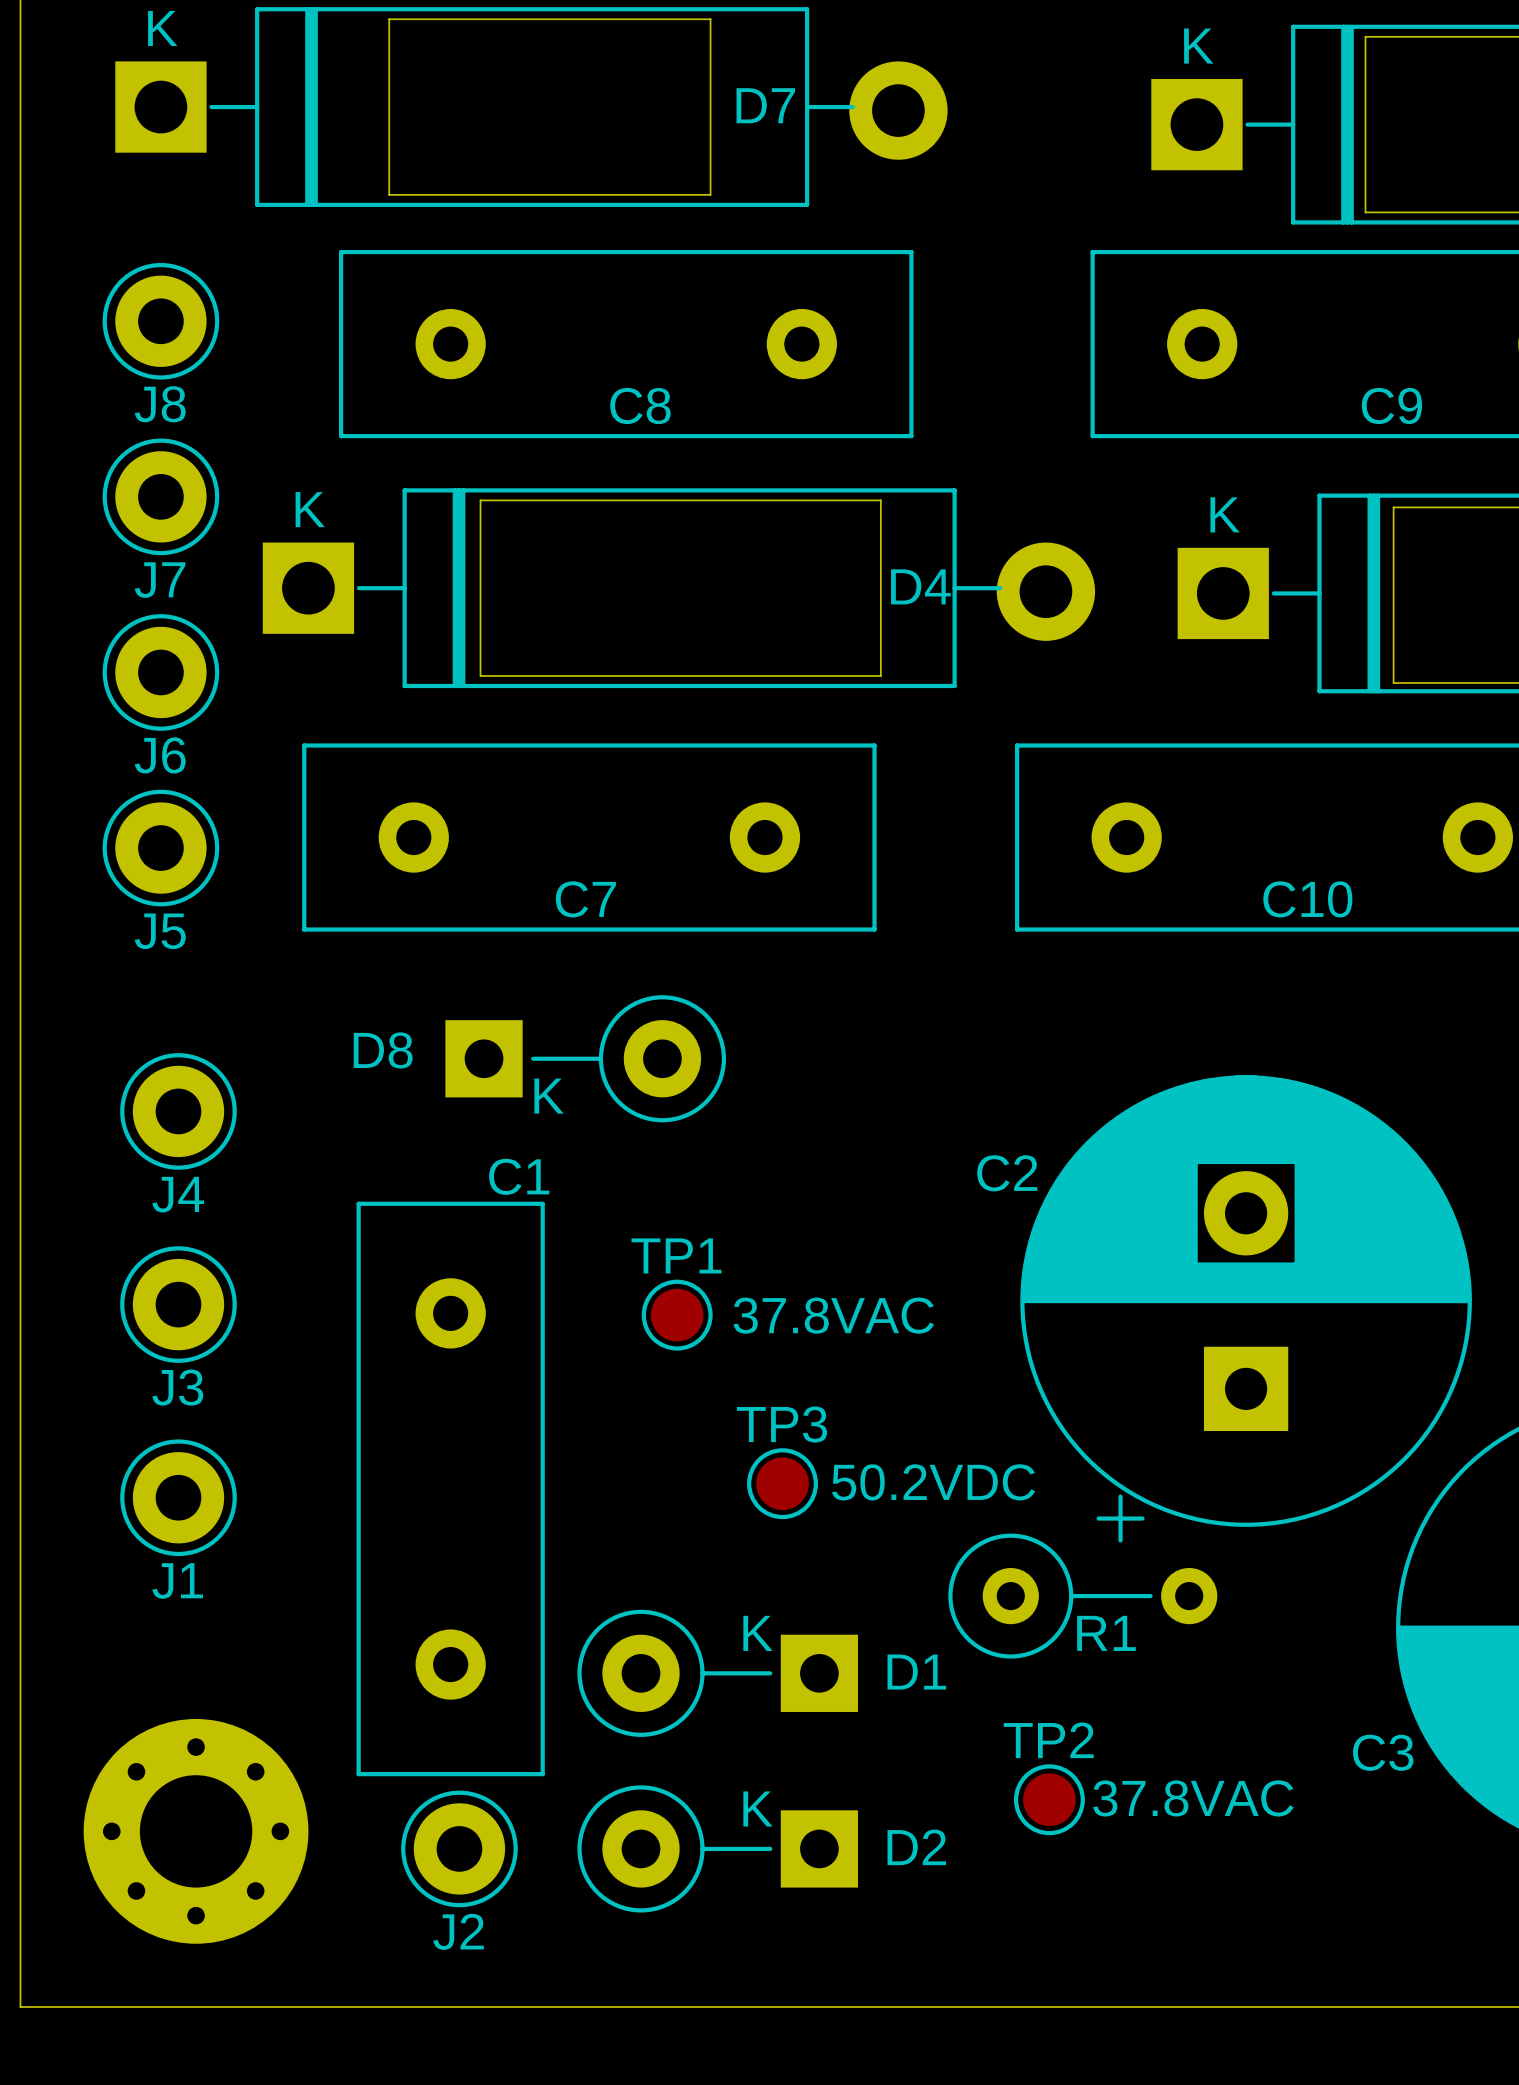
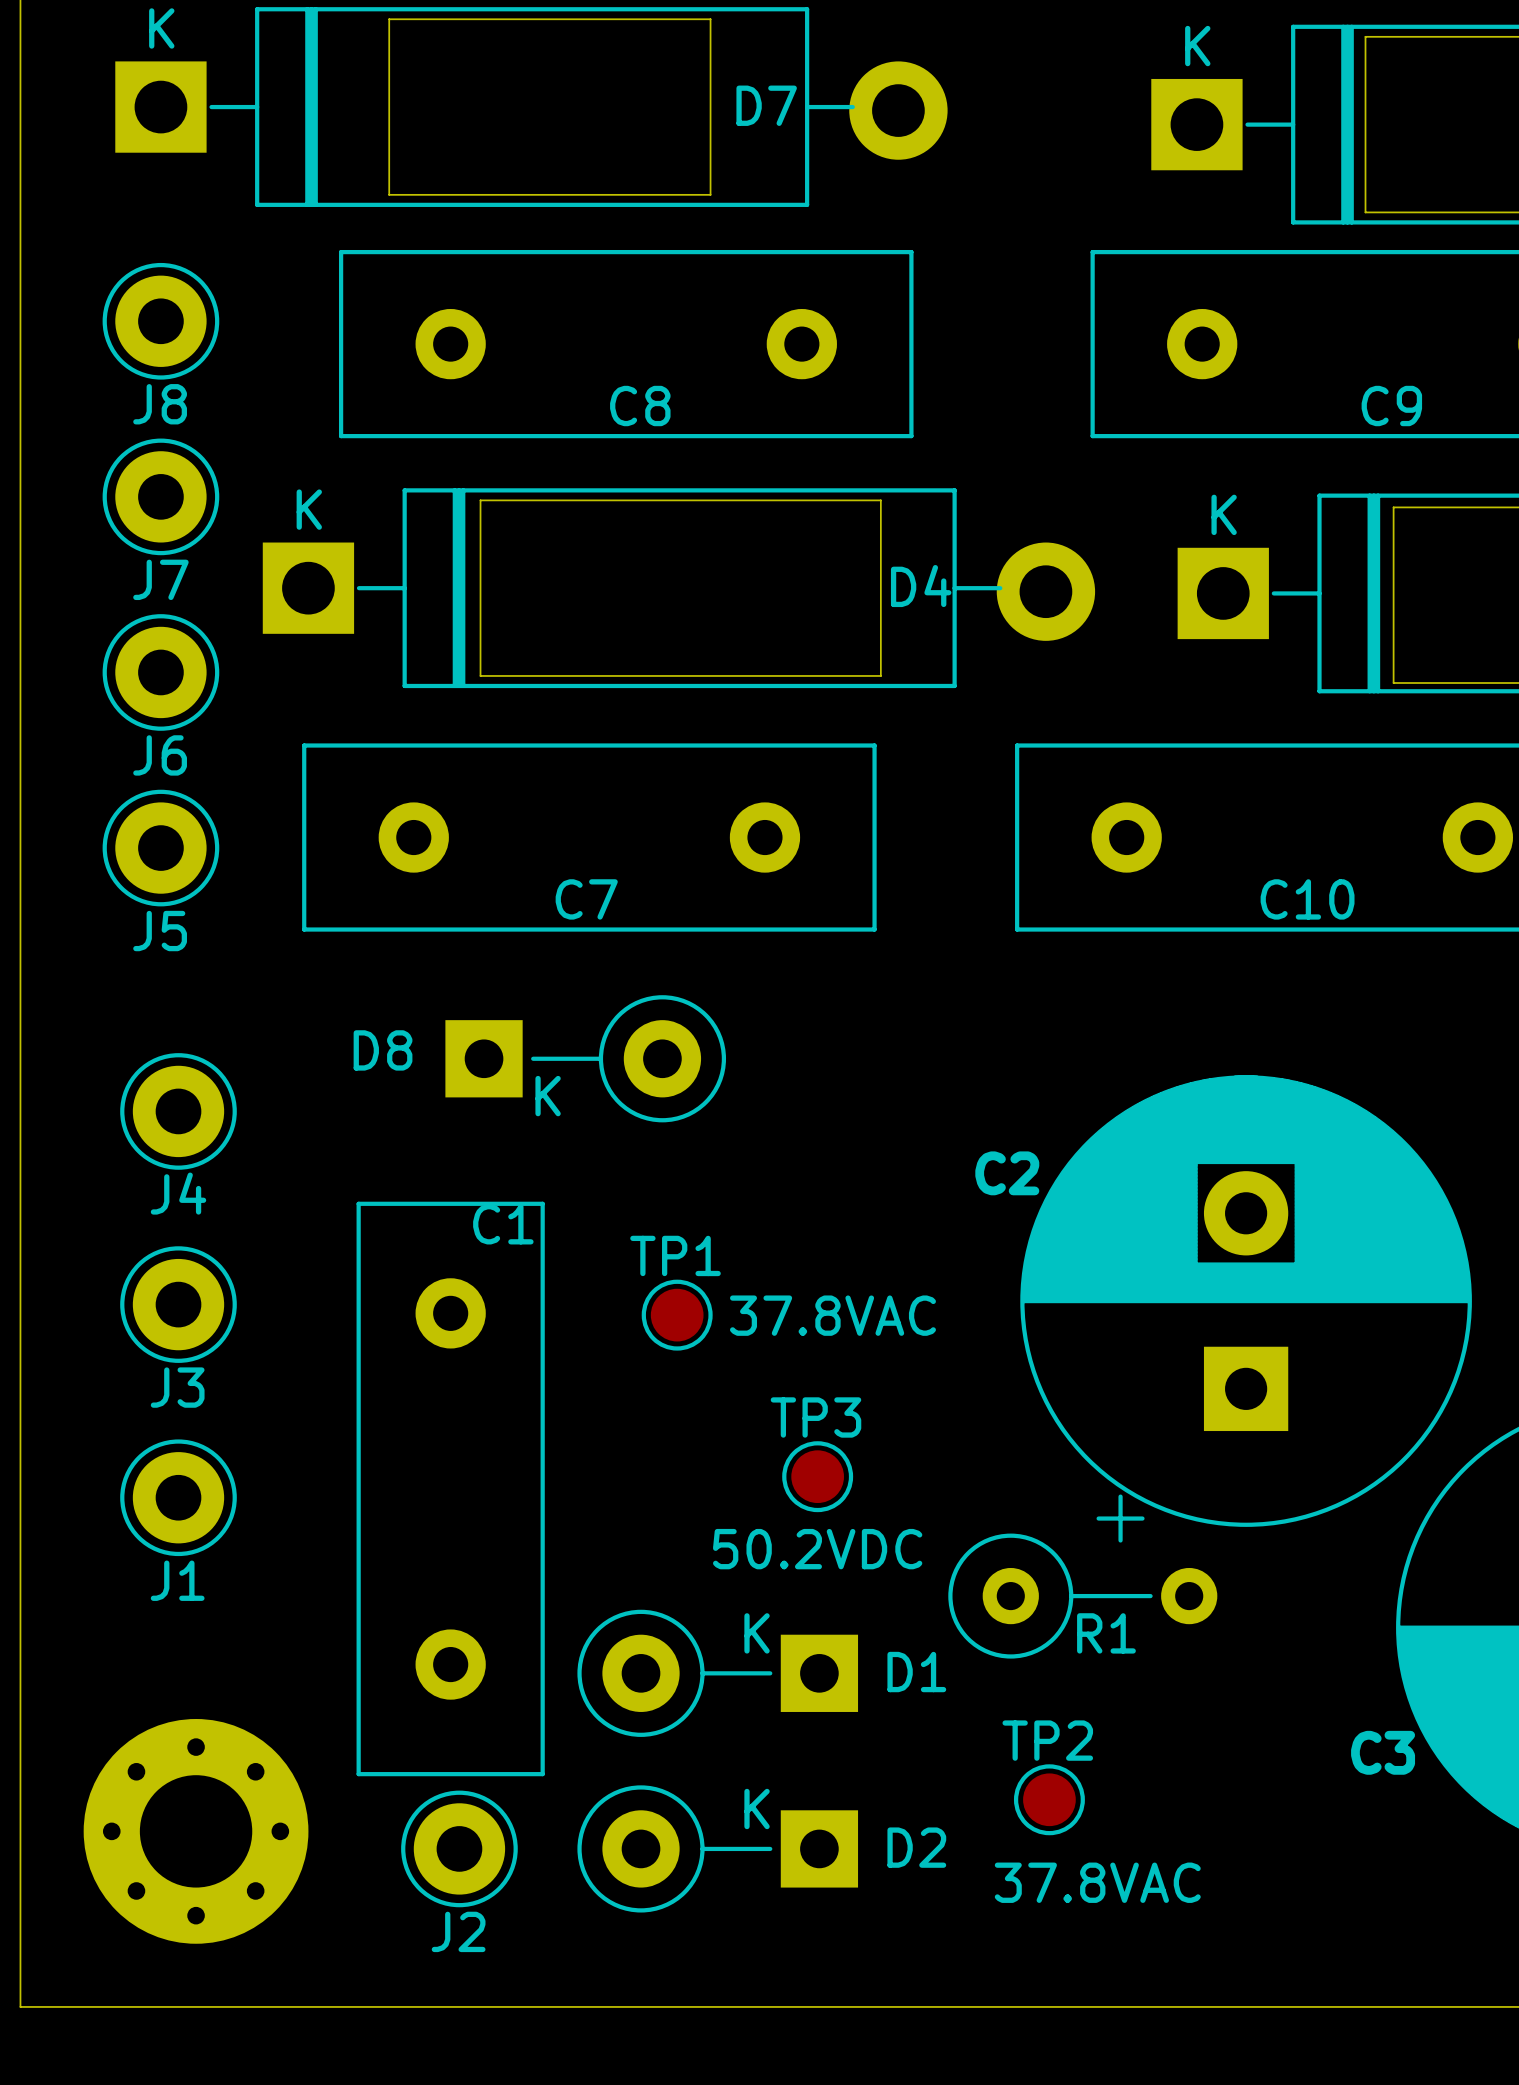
C1 name position: C1 (519, 1176) -> C1 (503, 1224)
TP3 value position: 50.2VDC (933, 1482) -> 50.2VDC (817, 1549)
TP3 position: (782, 1483) -> (817, 1476)
TP2 value position: 37.8VAC (1193, 1798) -> 37.8VAC (1097, 1882)

